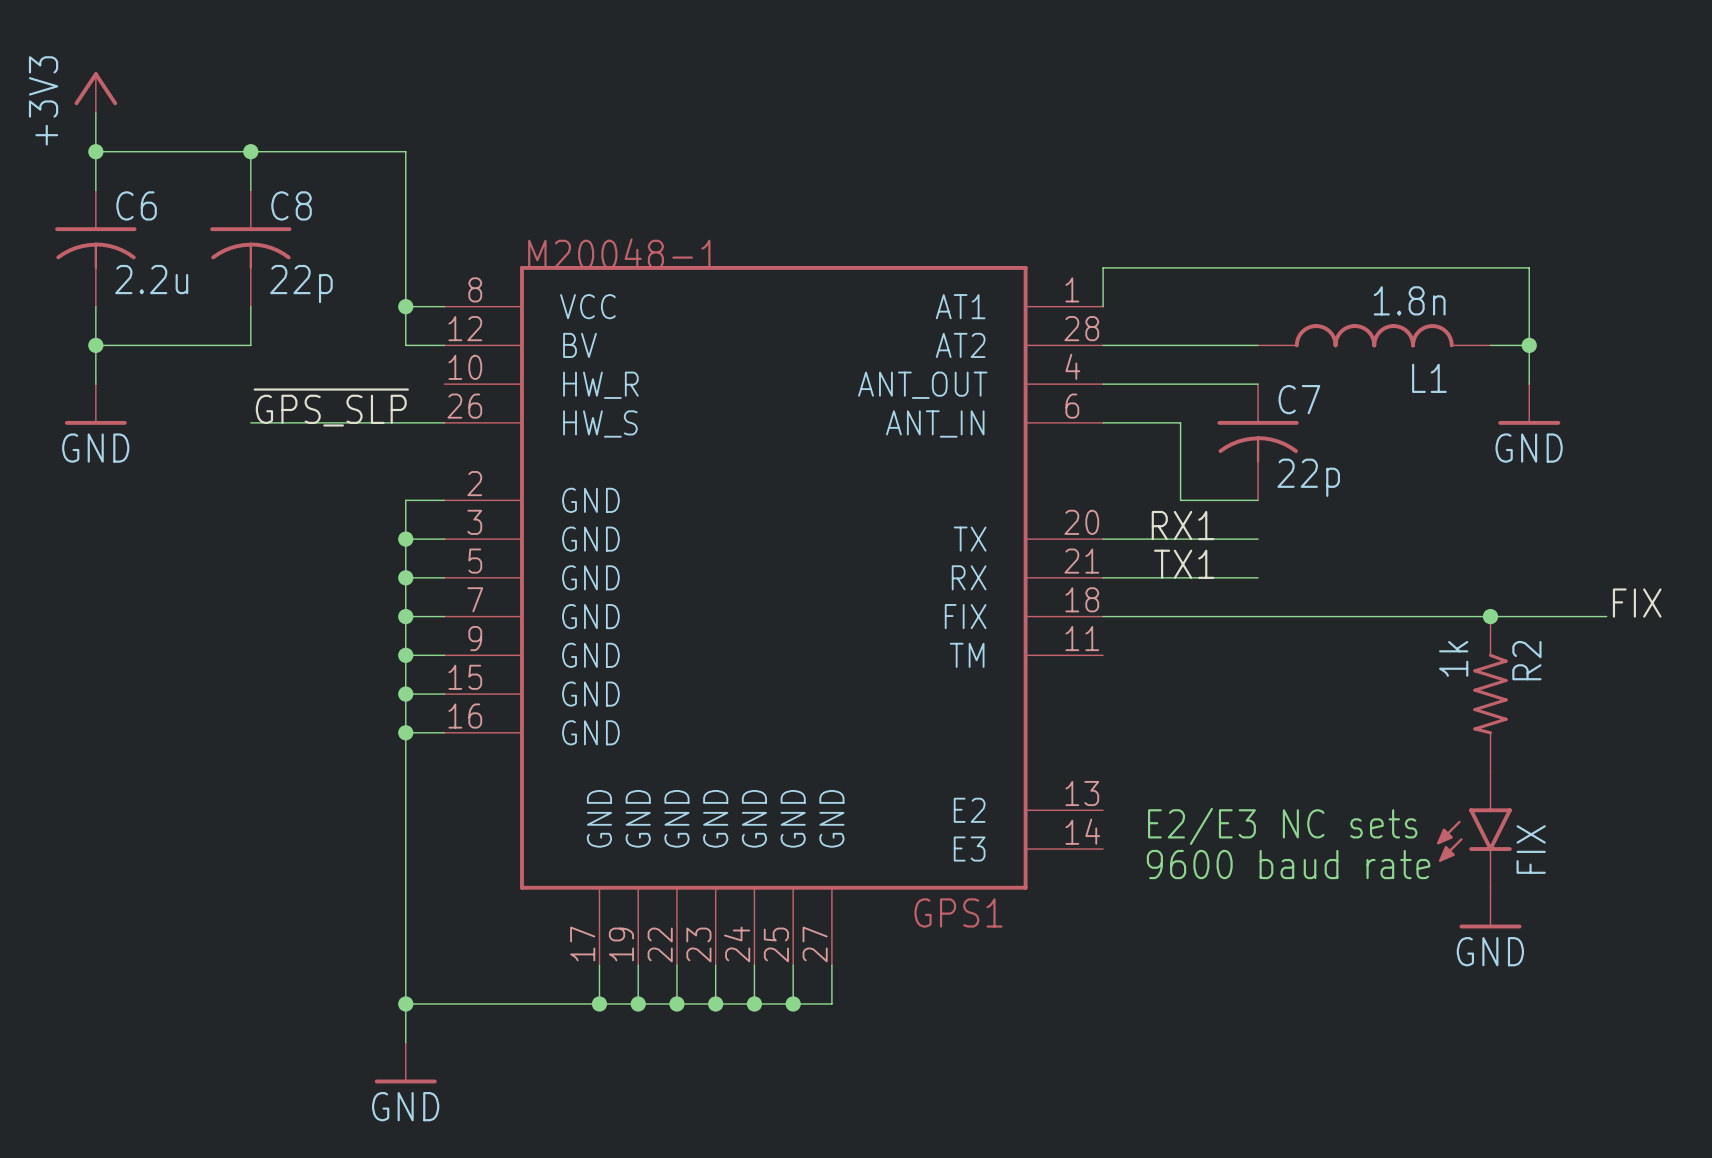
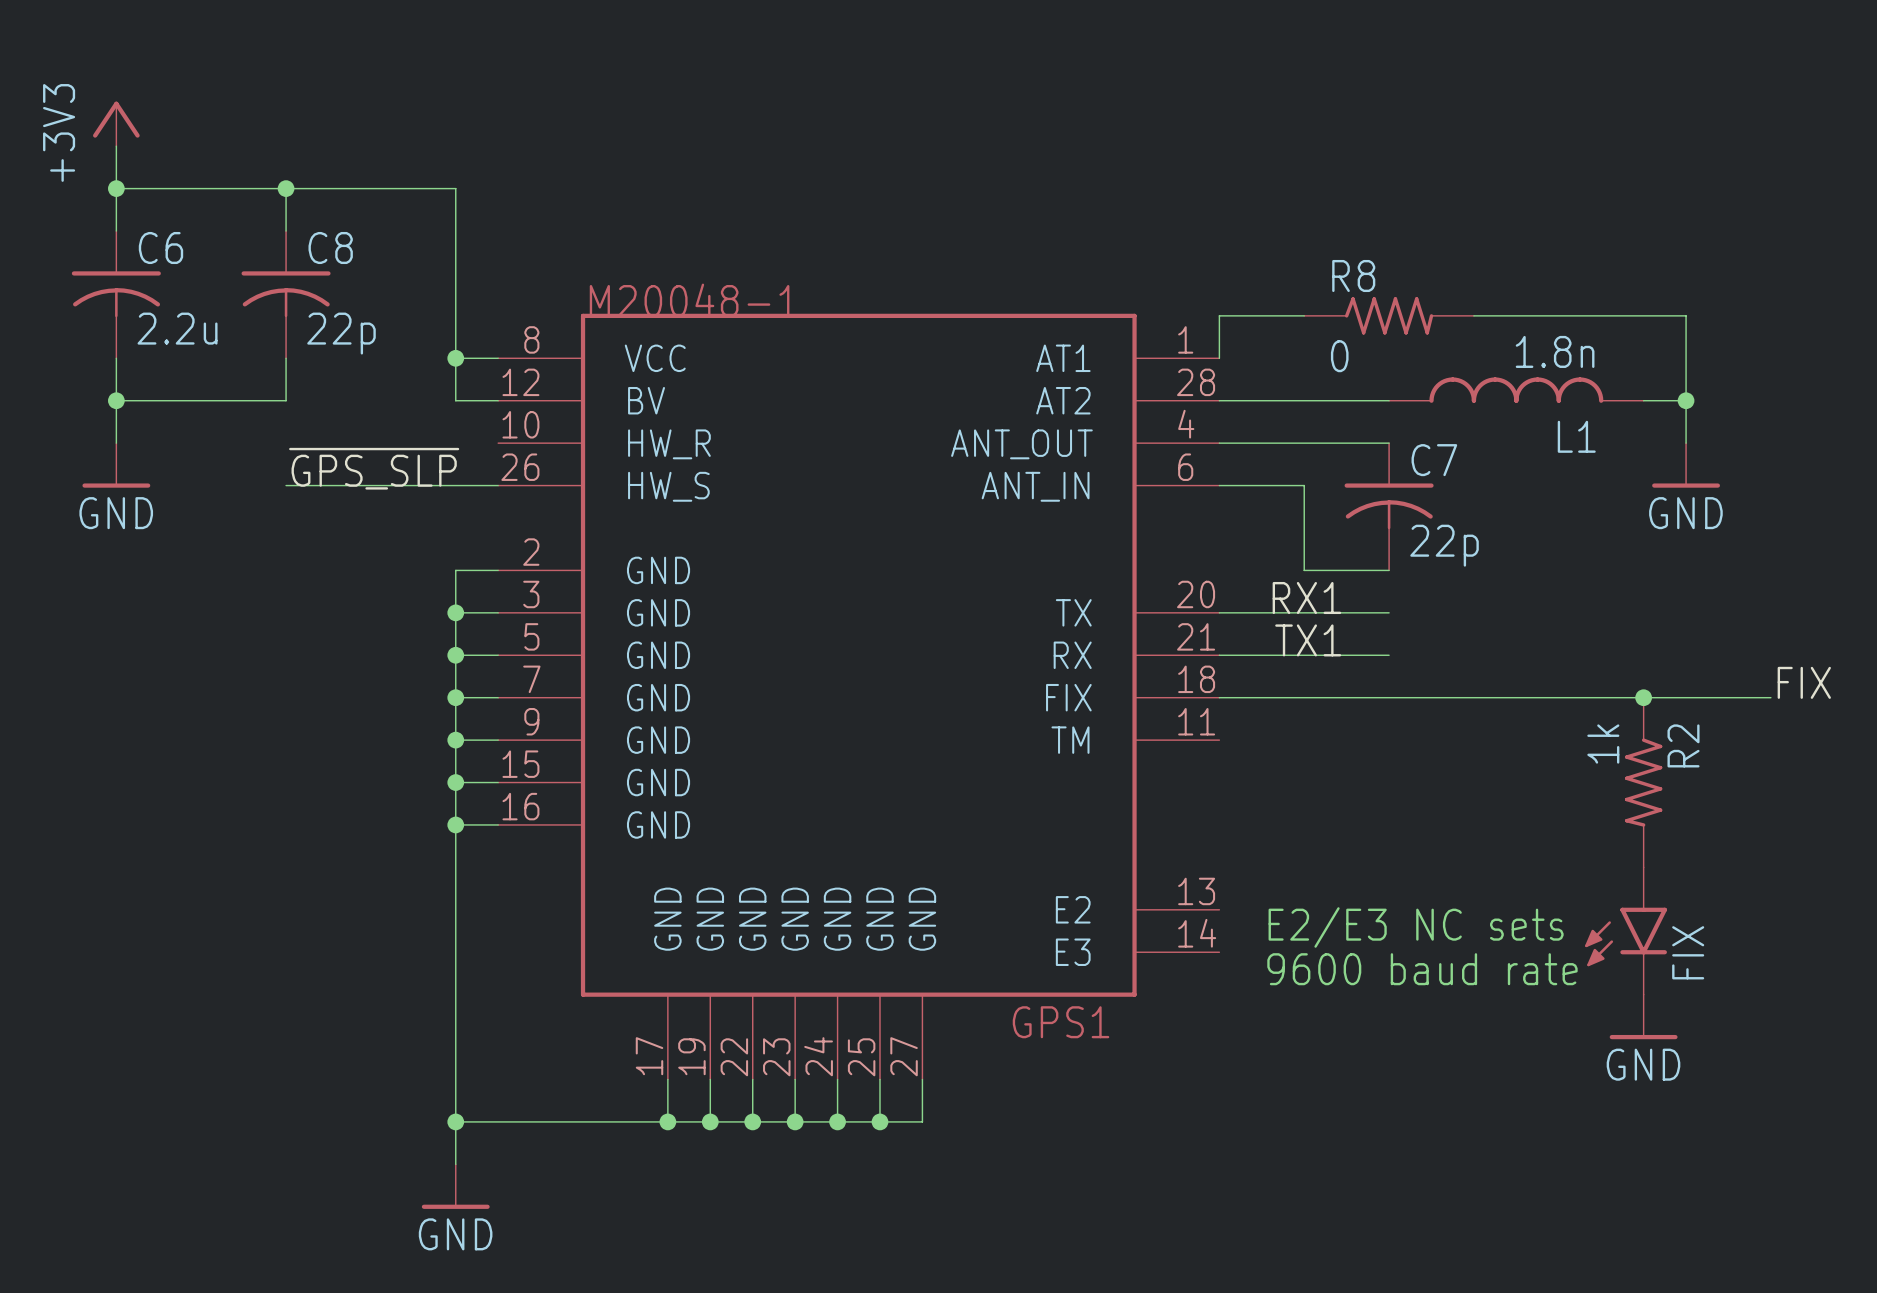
R8: none -> 0 (1389, 315)

